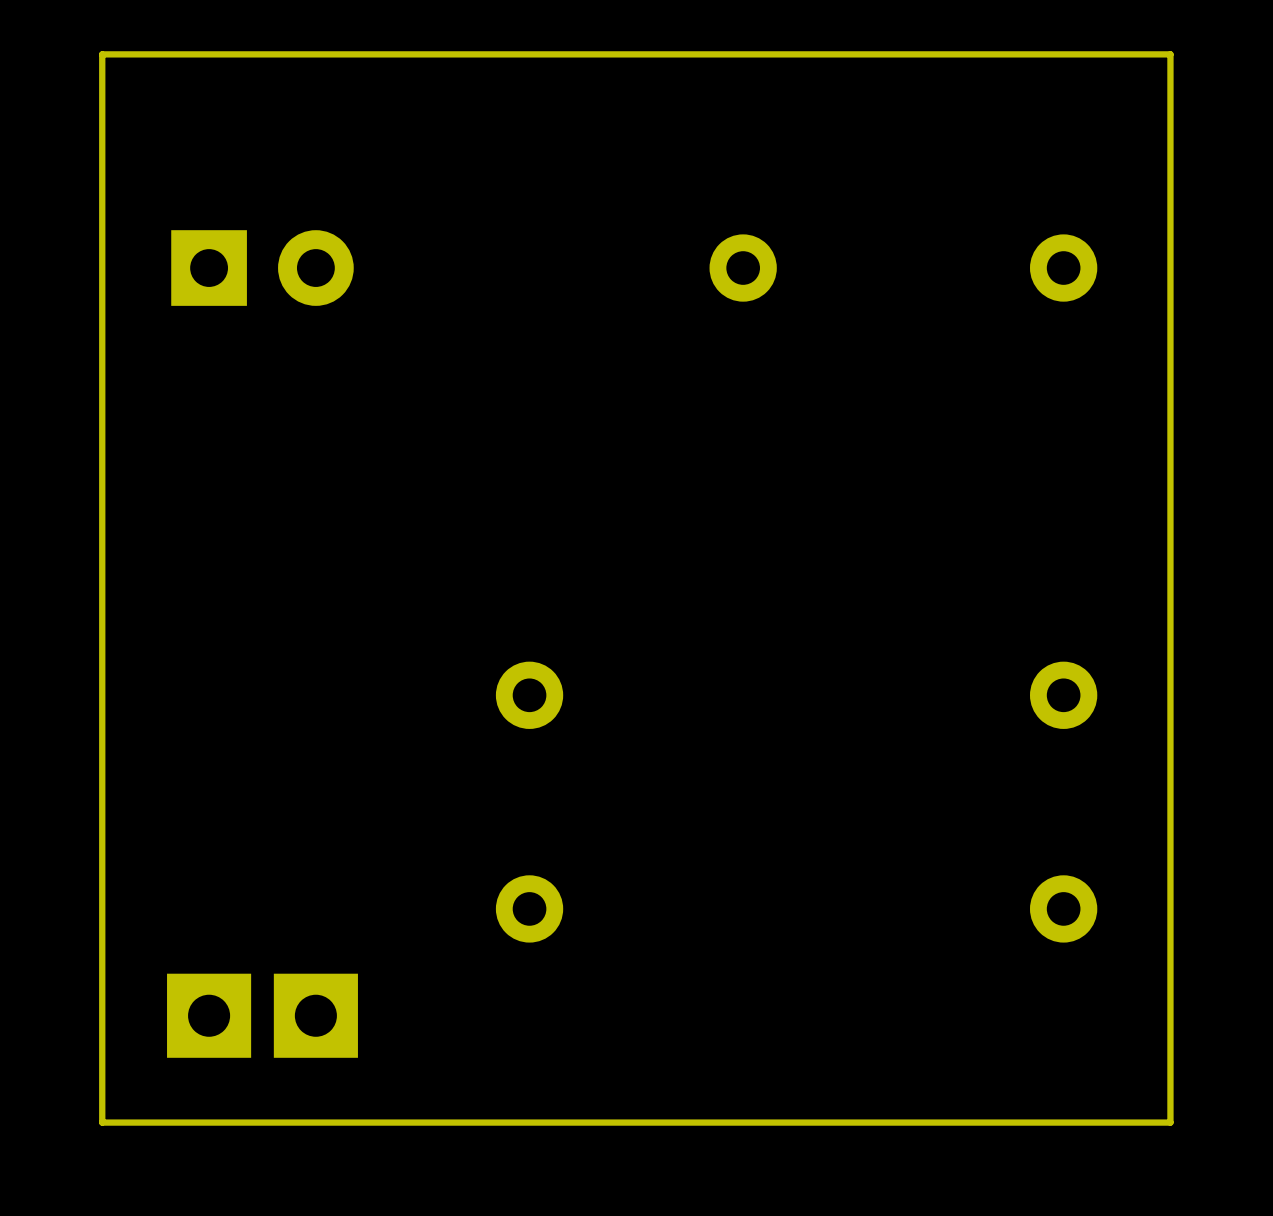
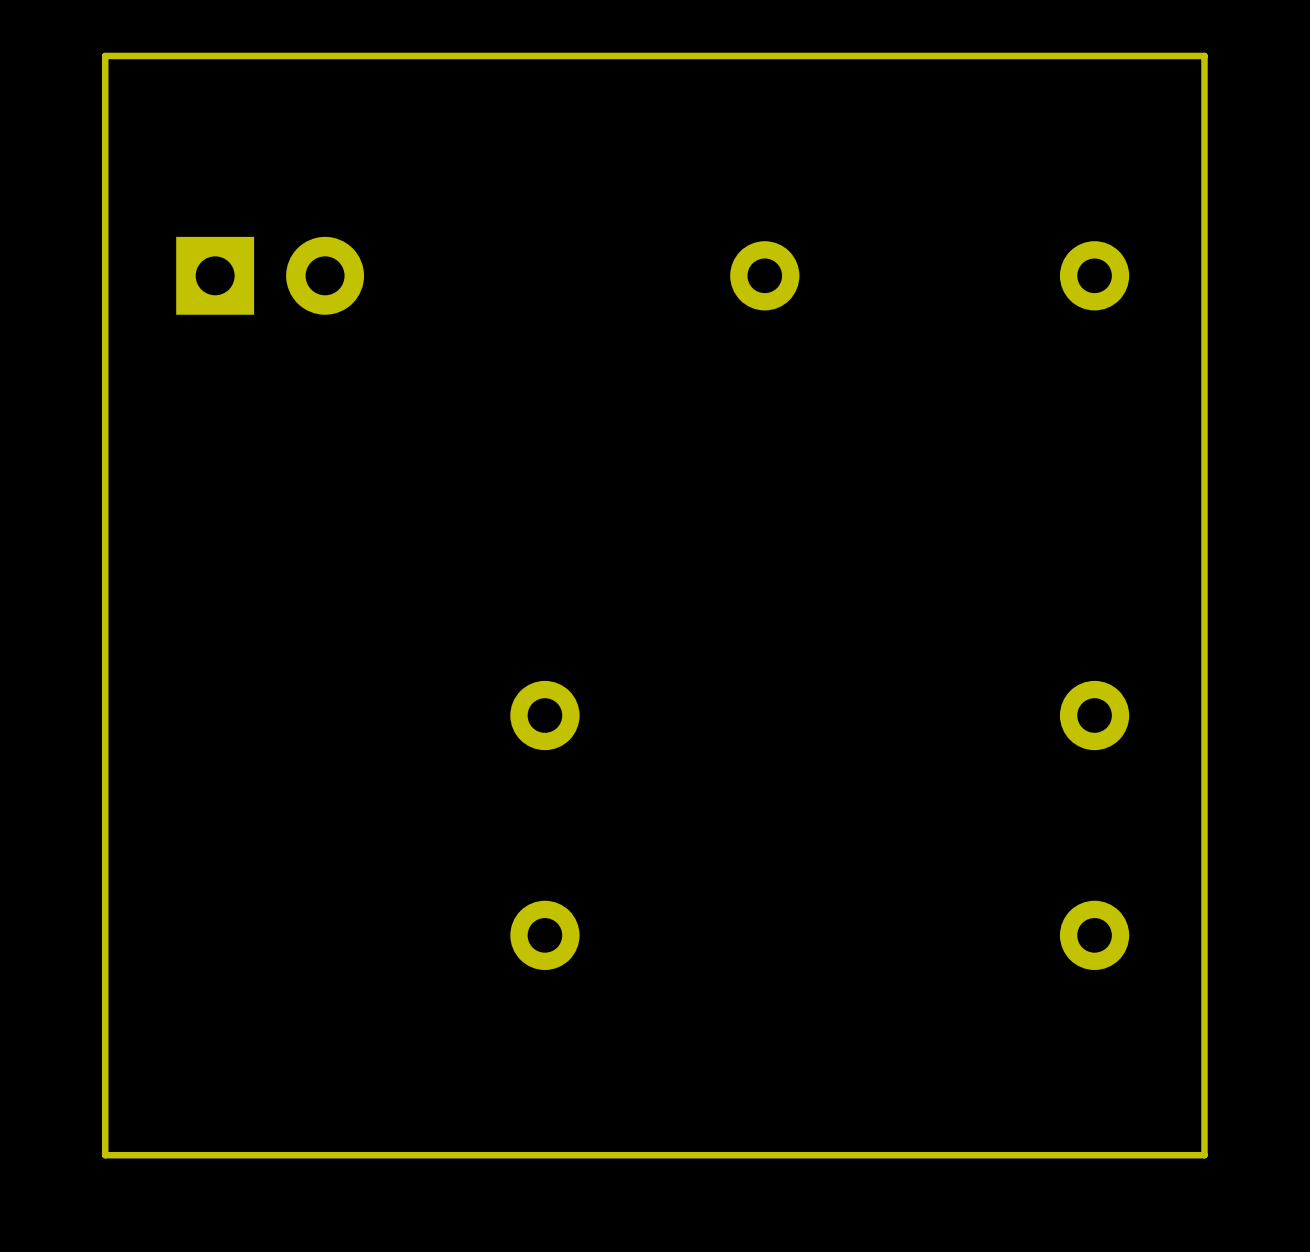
part: (209, 1015) -> none
part: (315, 1015) -> none

